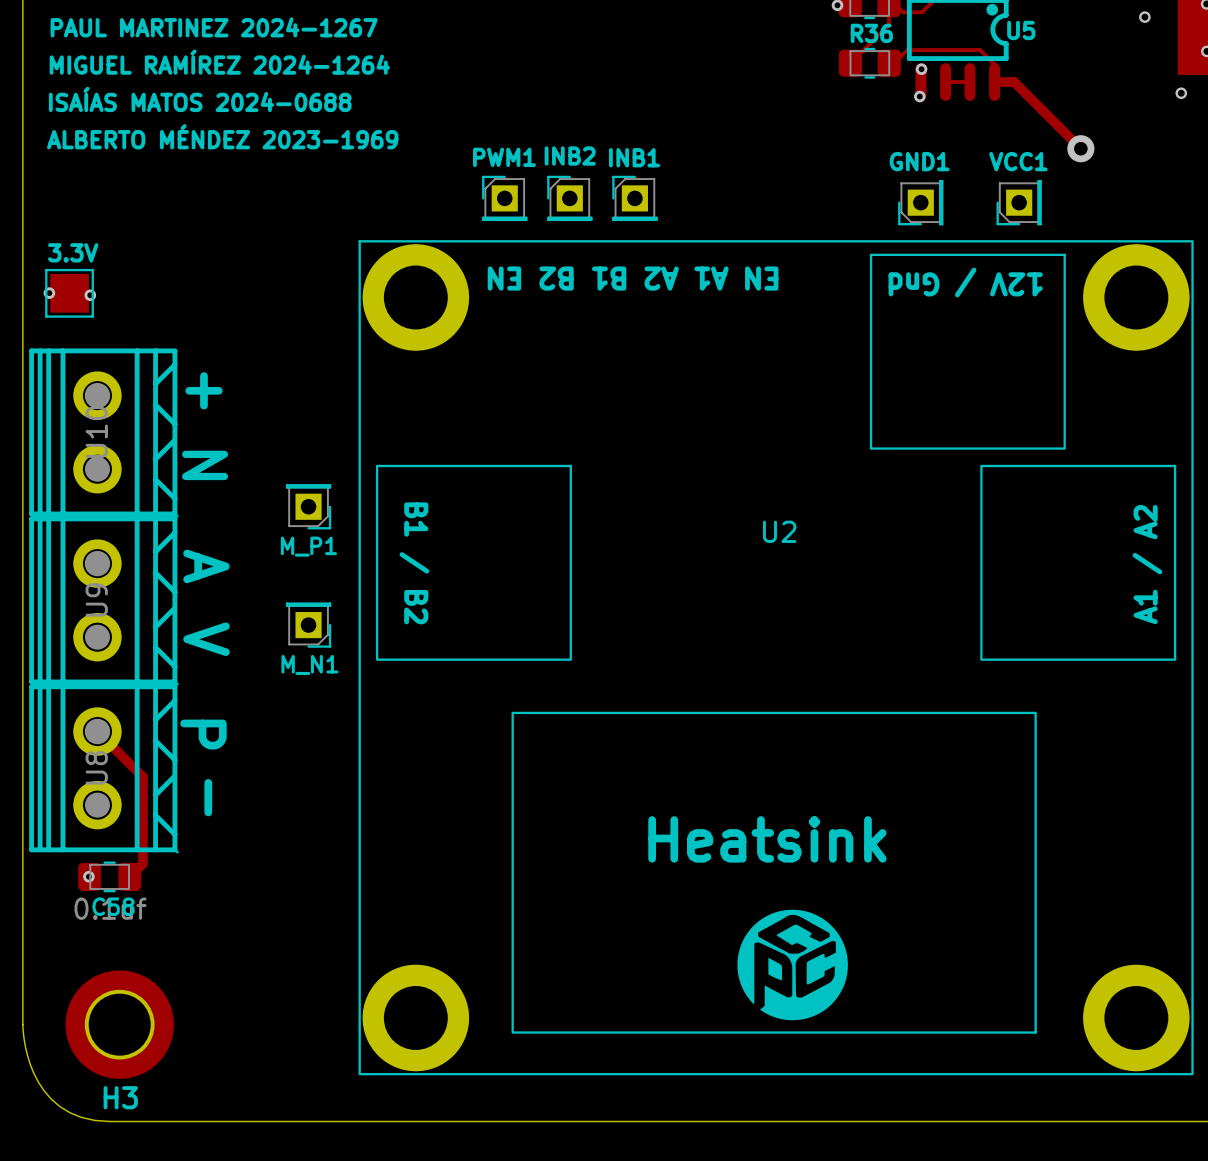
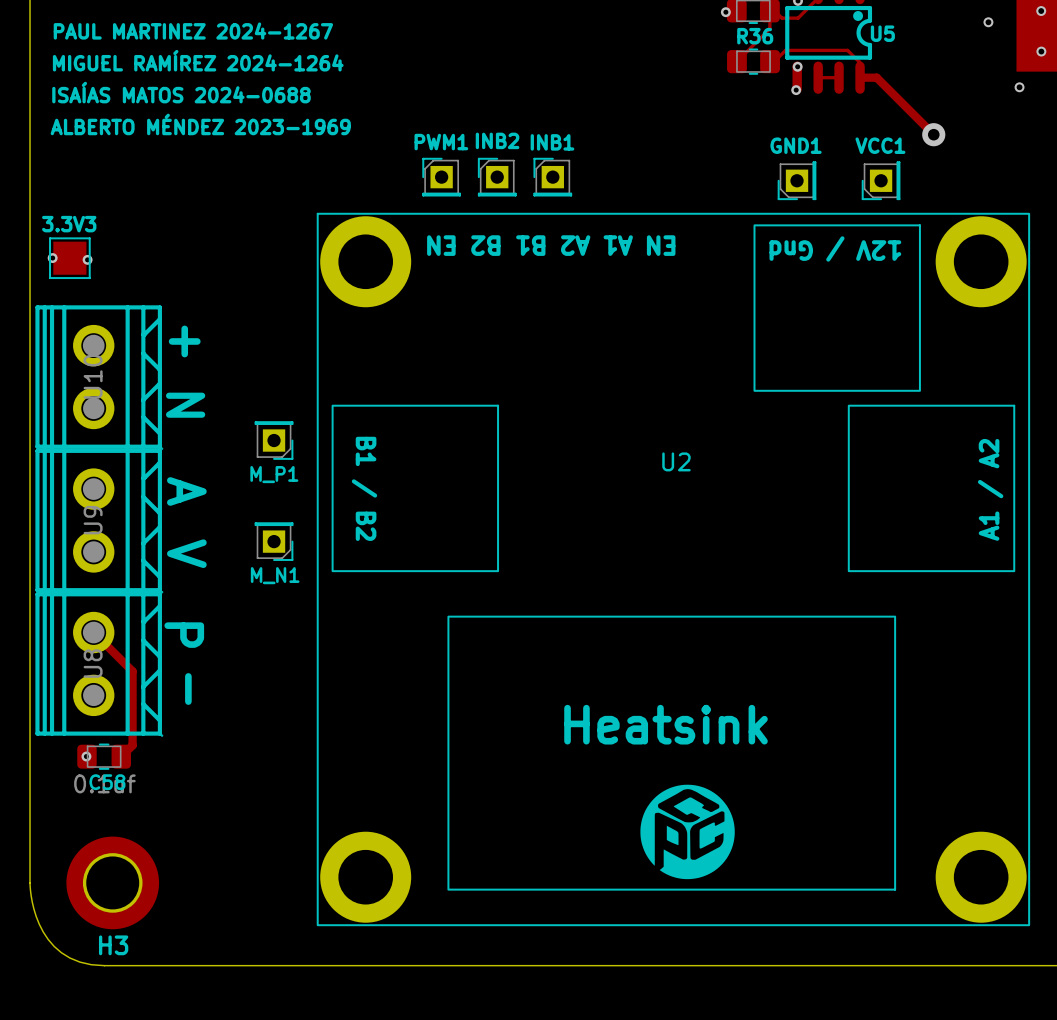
text: 3.3V (73, 252) -> none
3.3V3 name: none -> 3.3V3 (69, 224)

